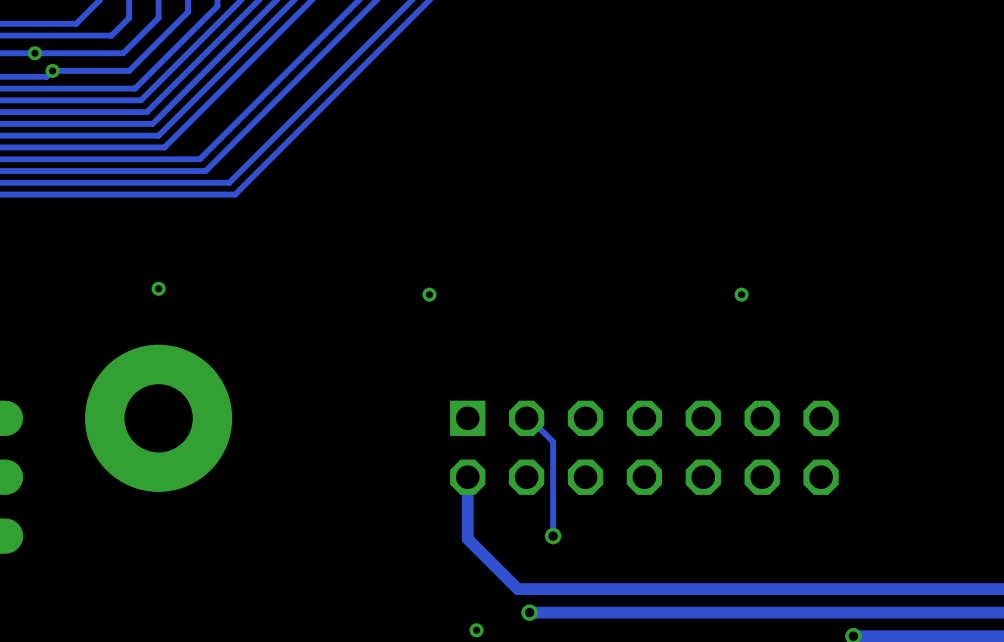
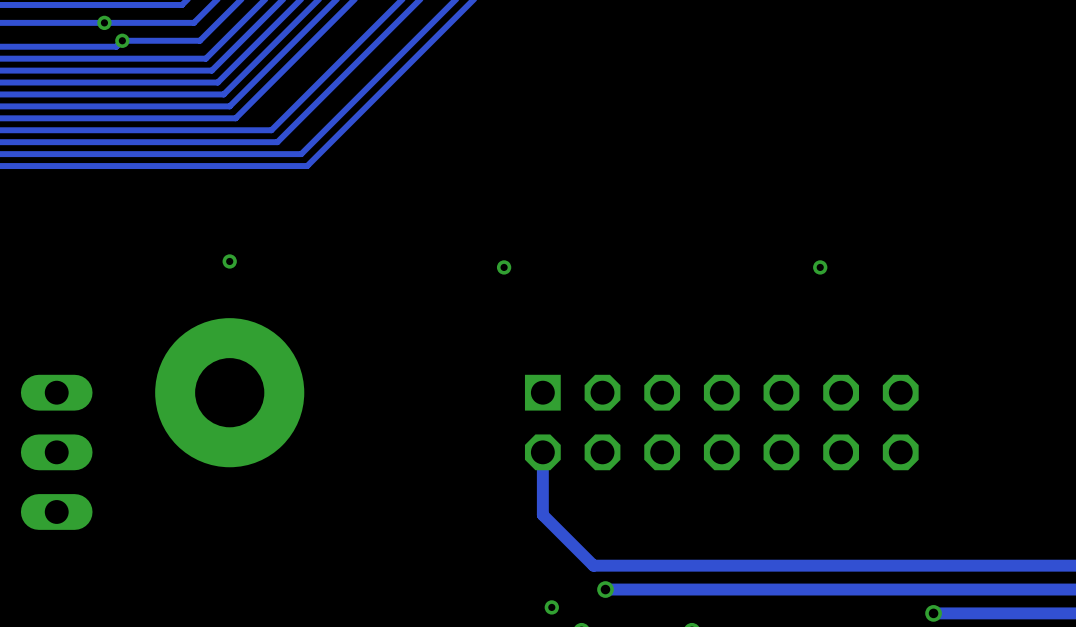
track: (529, 418) (553, 441) (553, 536) -> none
via: (553, 536) -> none

